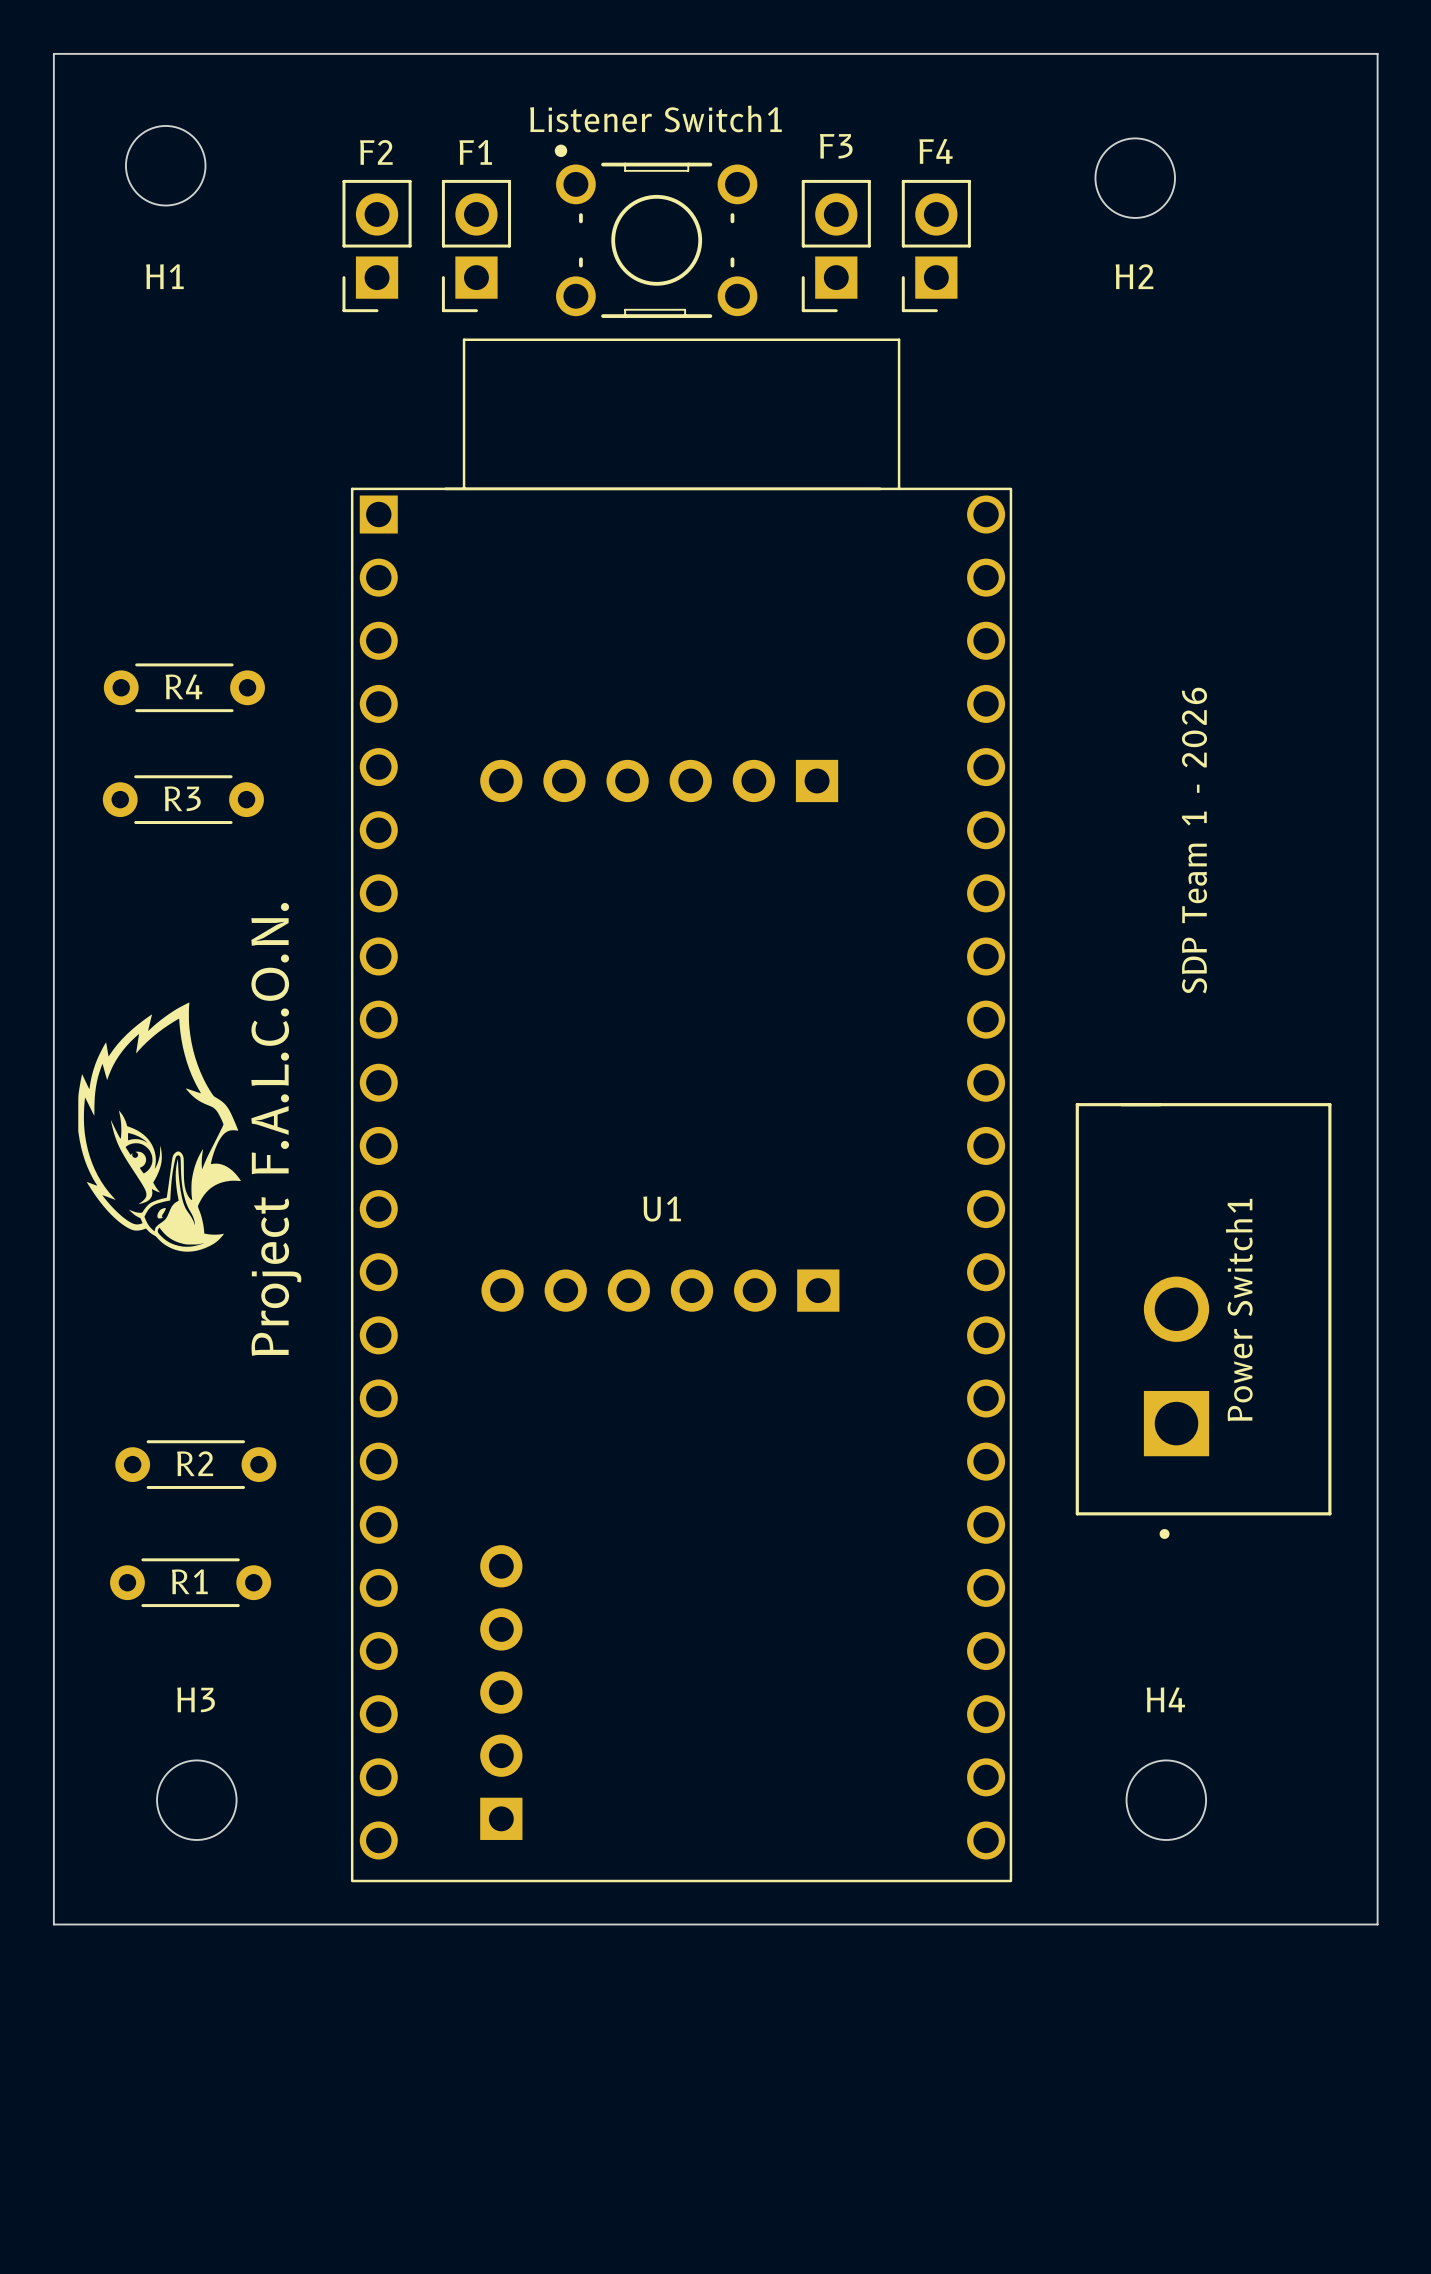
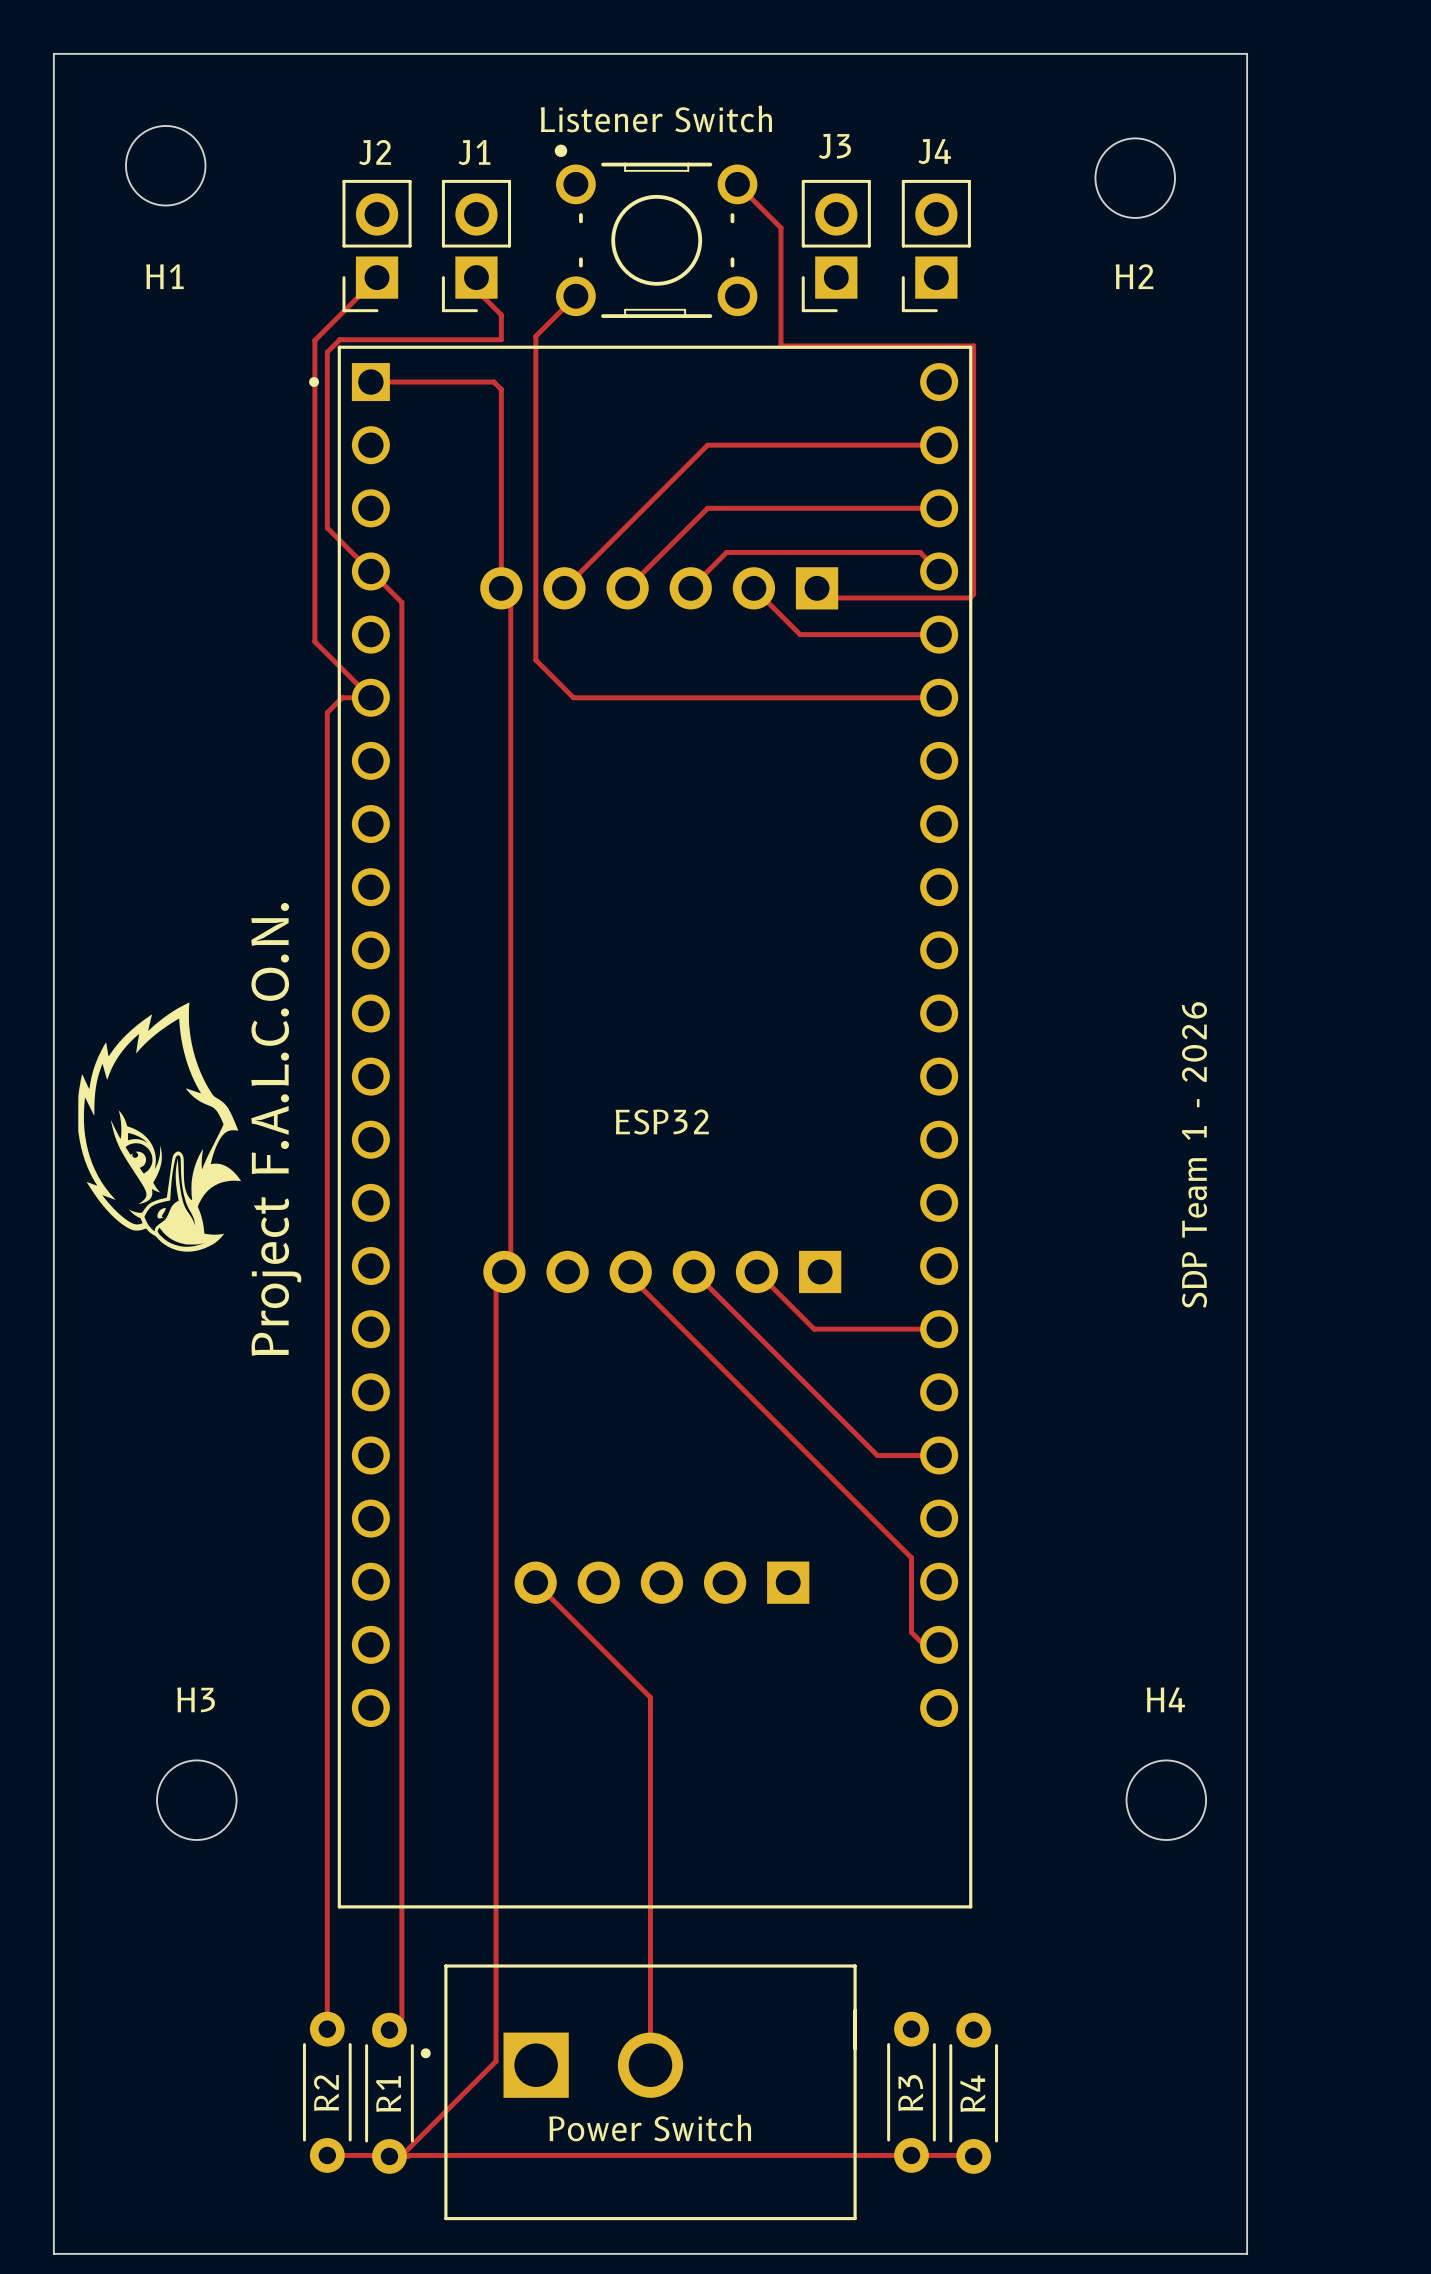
board edge: (1247, 53) (1377, 53) (1377, 1924) (53, 1924) -> (1247, 53) (1247, 2253) (53, 2253) (53, 1924)
Listener Switch1 name: Listener Switch1 (655, 118) -> Listener Switch (656, 118)
F3 name: F3 (836, 146) -> J3 (834, 146)
F4 name: F4 (936, 151) -> J4 (934, 151)
F2 name: F2 (376, 152) -> J2 (375, 152)
F1 name: F1 (475, 152) -> J1 (474, 152)
track: none -> (737, 184) (780, 227) (780, 345) (973, 345) (973, 594) (970, 597) (826, 597) (817, 588)
track: none -> (377, 277) (314, 340) (314, 641) (370, 697) (342, 697) (327, 712) (327, 2029)
track: none -> (476, 277) (476, 290) (501, 314) (501, 339) (339, 339) (327, 352) (327, 527) (401, 602) (401, 2017) (389, 2030)
track: none -> (575, 296) (535, 336) (535, 660) (573, 697) (939, 697)
track: none -> (370, 382) (493, 382) (501, 389) (501, 588)
track: none -> (939, 445) (707, 445) (564, 588)
track: none -> (939, 508) (707, 508) (627, 588)
track: none -> (939, 571) (920, 552) (726, 552) (690, 588)
track: none -> (510, 588) (510, 1265) (496, 1280) (496, 2061) (401, 2155) (389, 2156)
track: none -> (753, 588) (800, 634) (939, 634)
R4 rotation: 0° (184, 687) -> 90° clockwise (973, 2093)
R4 position: (184, 687) -> (973, 2093)
part position: (659, 780) -> (659, 588)
R3 rotation: 0° (183, 799) -> 90° clockwise (911, 2092)
R3 position: (183, 799) -> (911, 2092)
text position: SDP Team 1 - 2026 (1194, 840) -> SDP Team 1 - 2026 (1194, 1155)
U1: (681, 1110) -> none
ESP32: none -> (640, 1127)
track: none -> (630, 1271) (630, 1277) (911, 1557) (911, 1632) (923, 1644) (939, 1644)
track: none -> (693, 1271) (877, 1455) (939, 1455)
track: none -> (757, 1271) (814, 1329) (939, 1329)
part position: (660, 1290) -> (662, 1271)
Power Switch1: (1203, 1321) -> none
R2 rotation: 0° (195, 1464) -> 90° clockwise (327, 2092)
R2 position: (195, 1464) -> (327, 2092)
R1 rotation: 0° (190, 1582) -> 90° clockwise (389, 2093)
R1 position: (190, 1582) -> (389, 2093)
track: none -> (535, 1582) (650, 1697) (650, 2055)
part rotation: 0° (501, 1692) -> 90° counterclockwise (661, 1582)
part position: (501, 1692) -> (661, 1582)
Power Switch: none -> (638, 2092)
track: none -> (327, 2155) (389, 2156)
track: none -> (389, 2156) (973, 2156)

